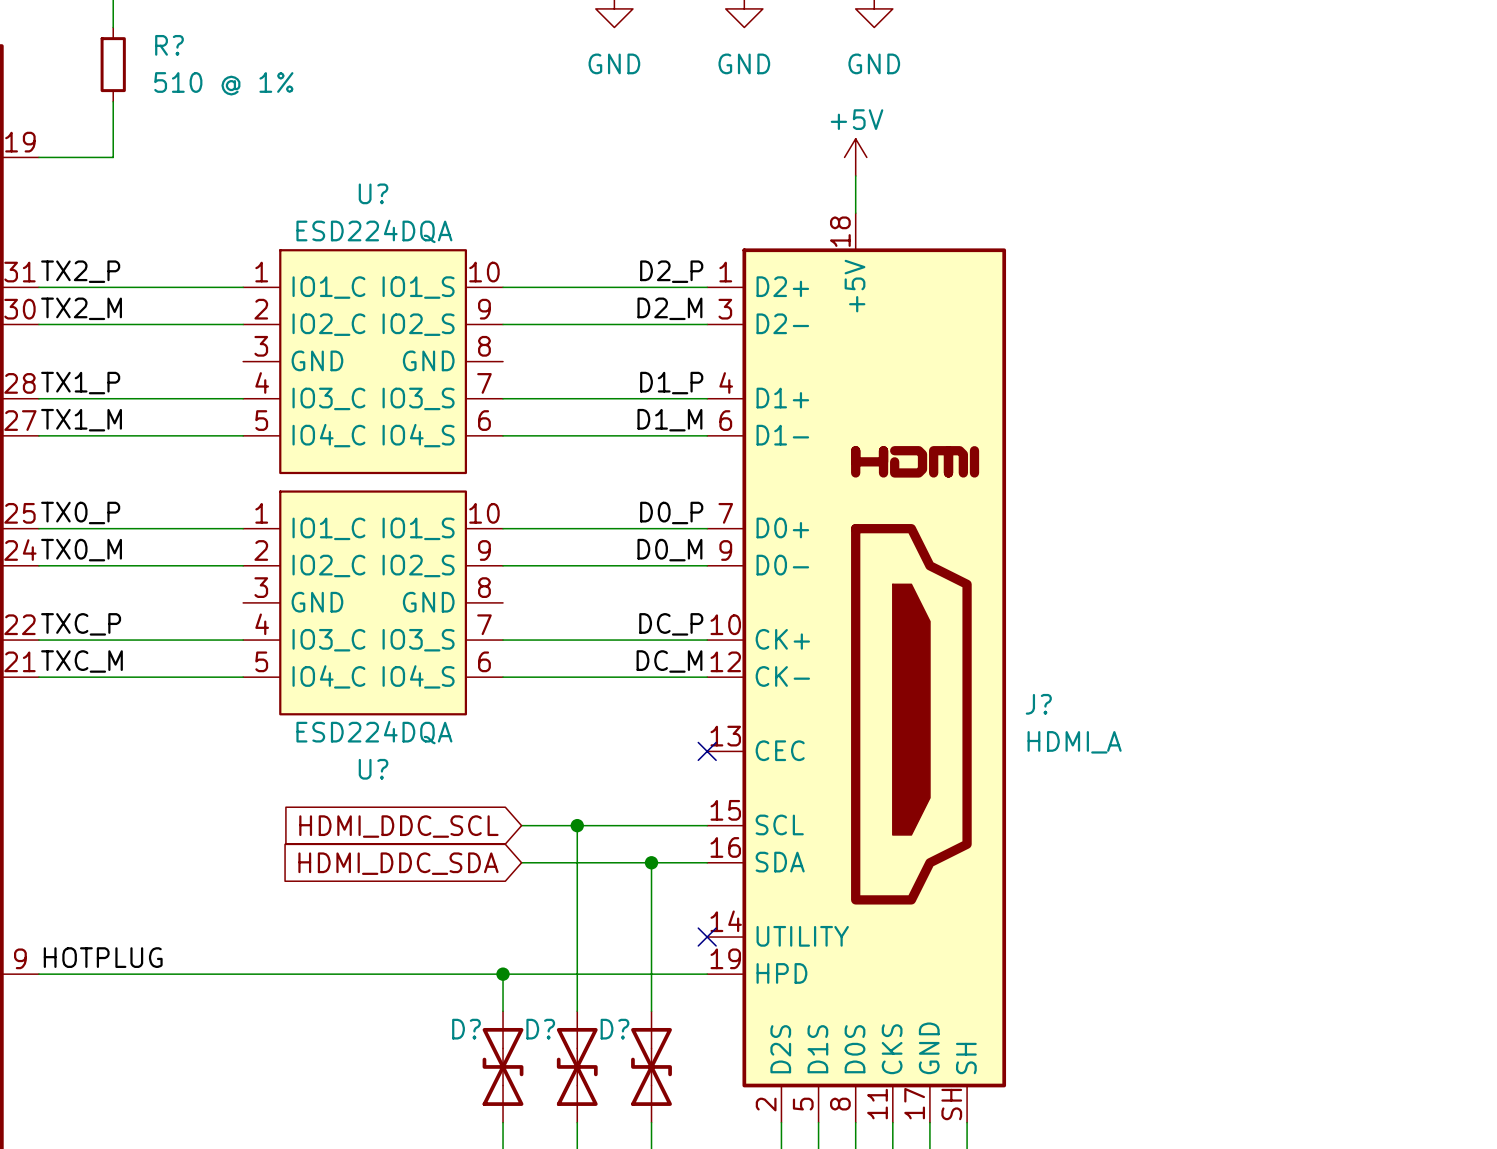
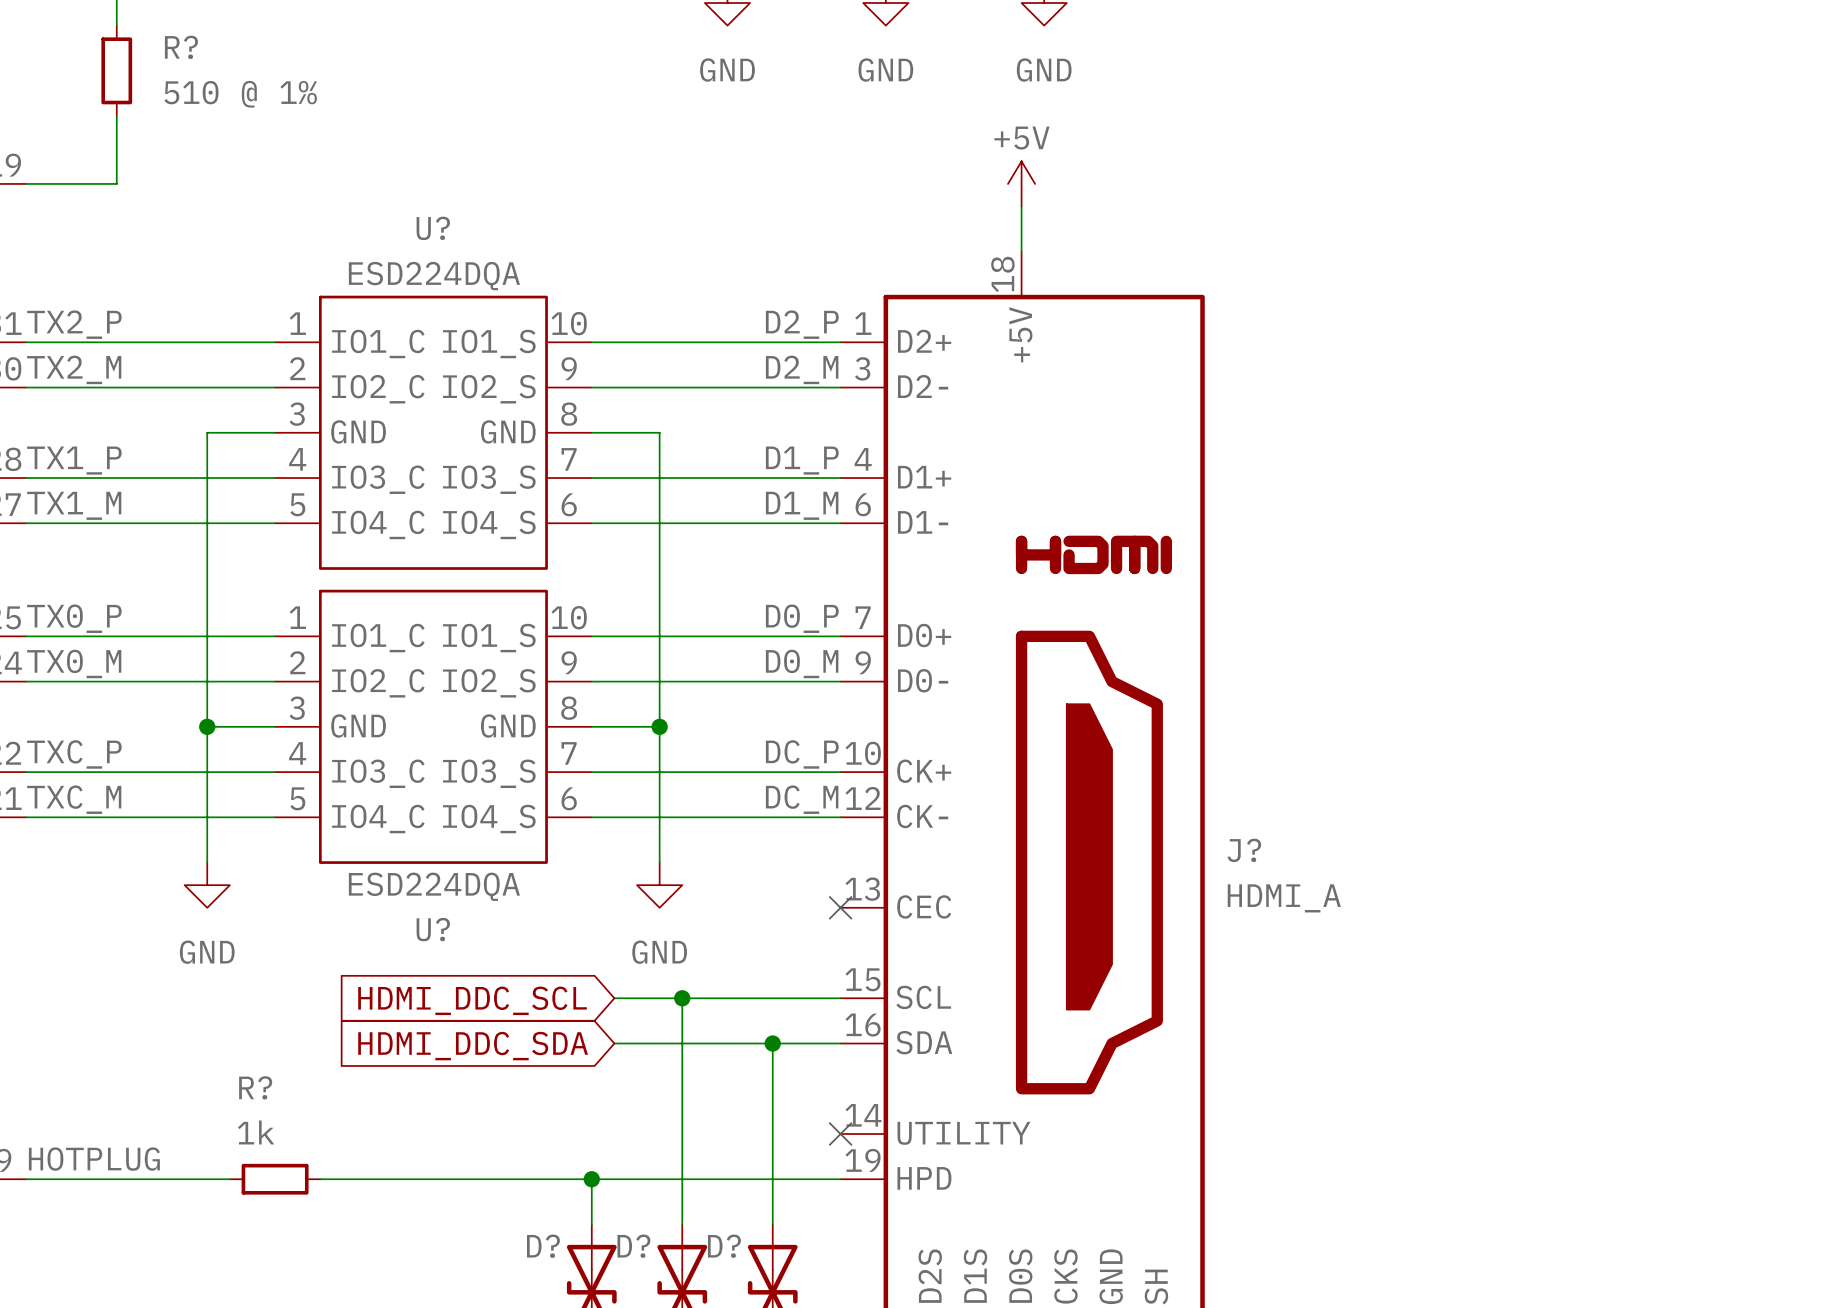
wire: none -> (275, 432) (207, 432) (207, 862)
wire: none -> (591, 432) (659, 432) (659, 862)
wire: none -> (207, 726) (275, 726)
junction: none -> (207, 726)
wire: none -> (591, 726) (659, 726)
junction: none -> (659, 726)
power symbol: none -> GND (207, 885)
power symbol: none -> GND (659, 885)
wire: (206, 974) (280, 974) -> none
R?: none -> 1k (275, 1179)

